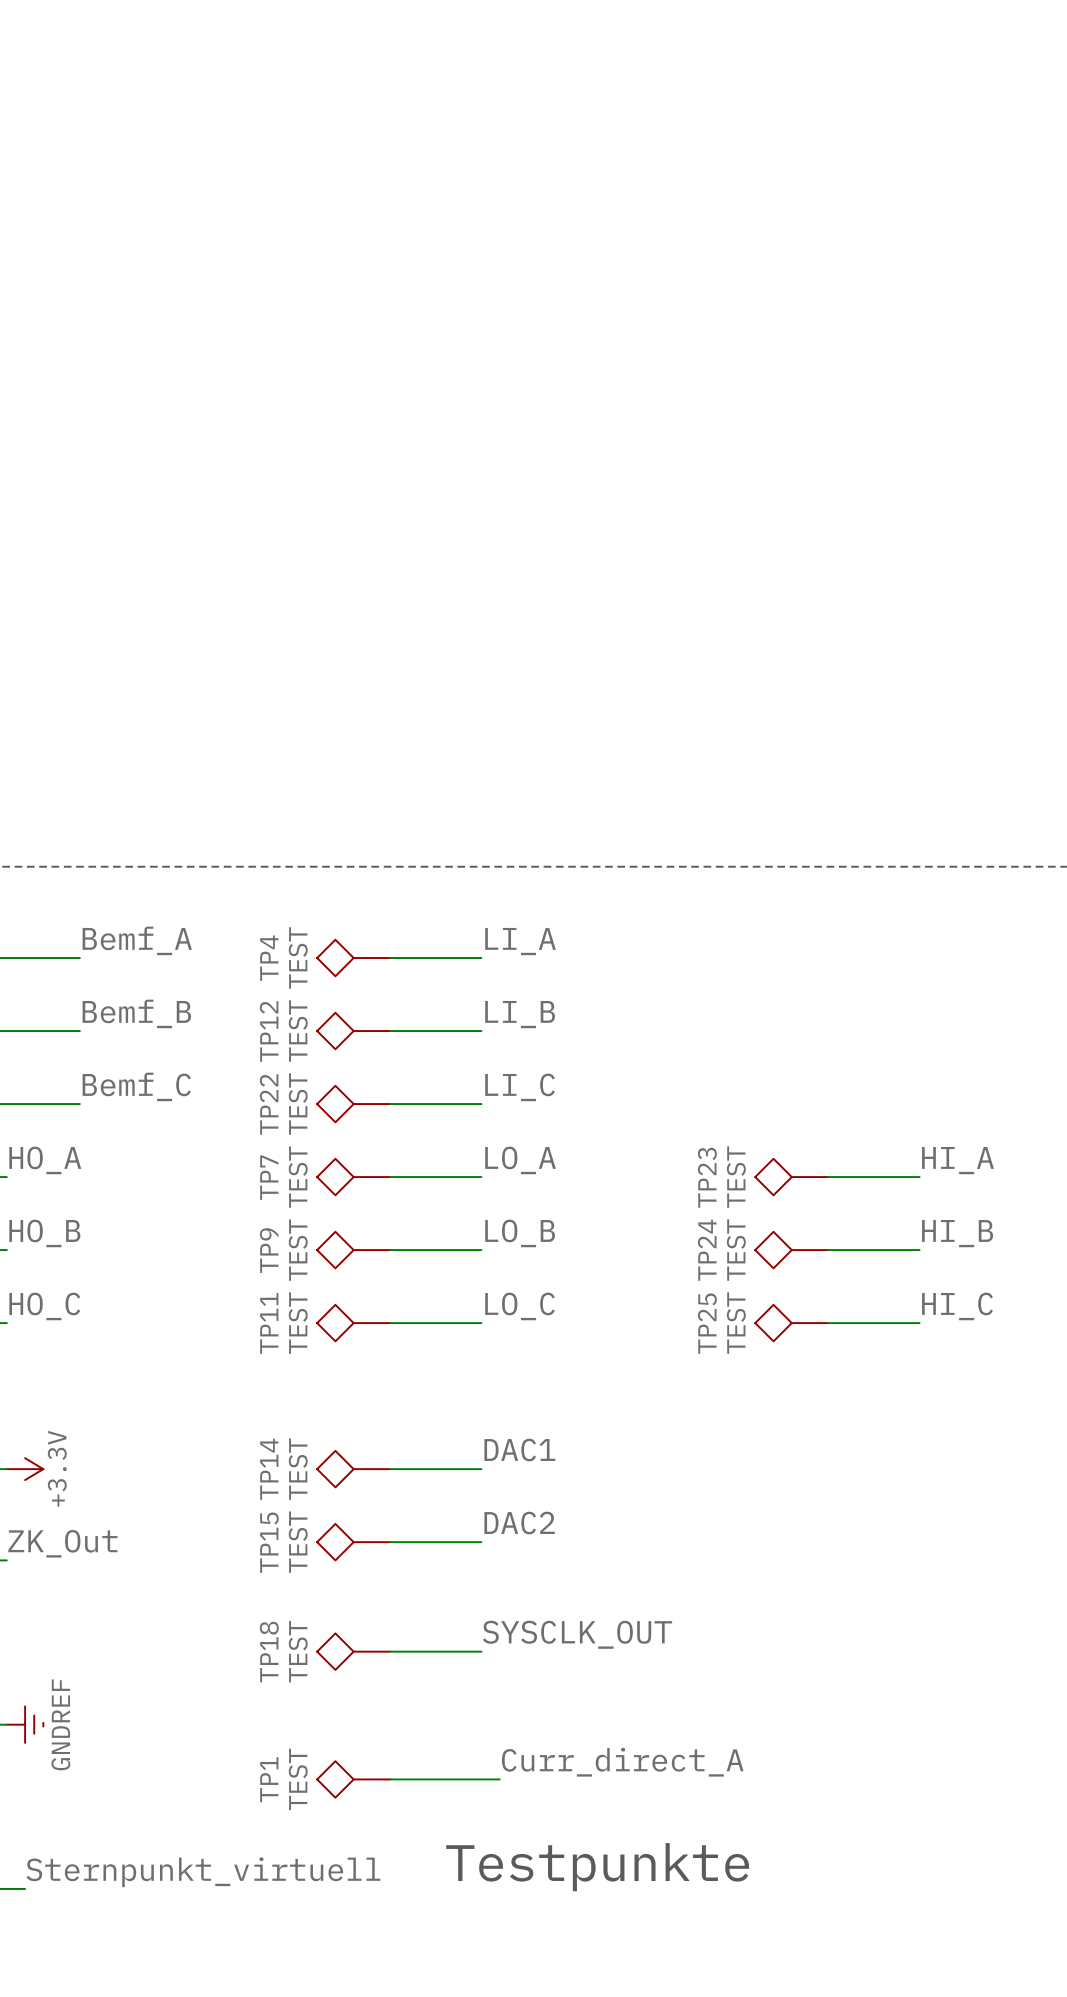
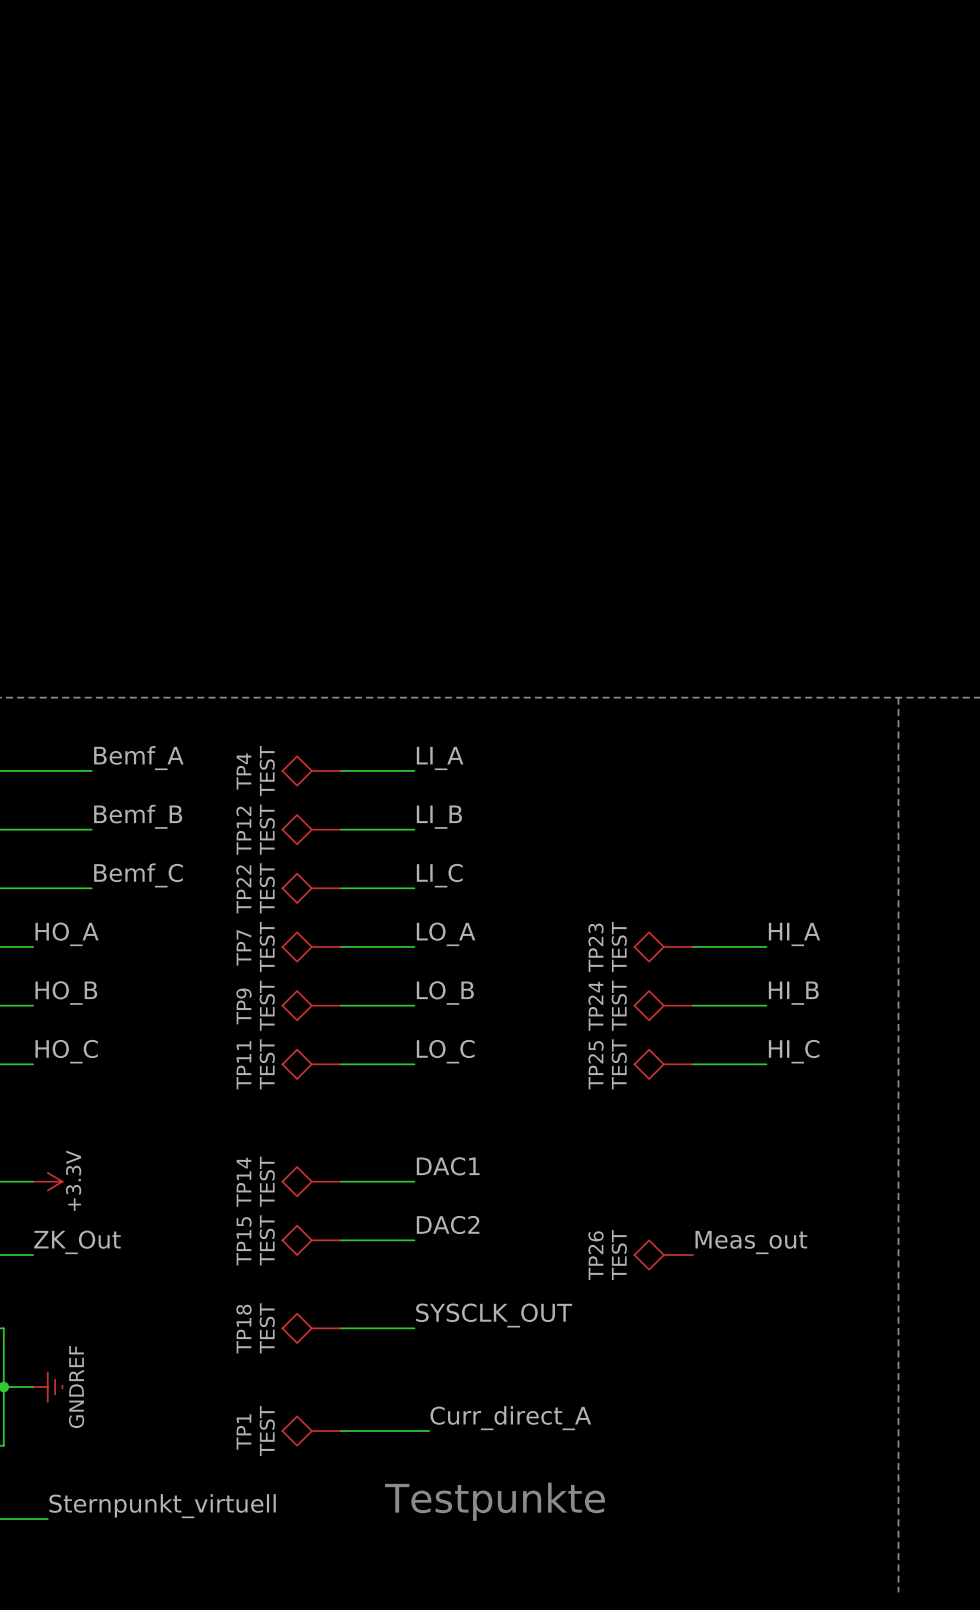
label: none -> Meas_out (751, 1242)
TP26: none -> TEST (663, 1255)

